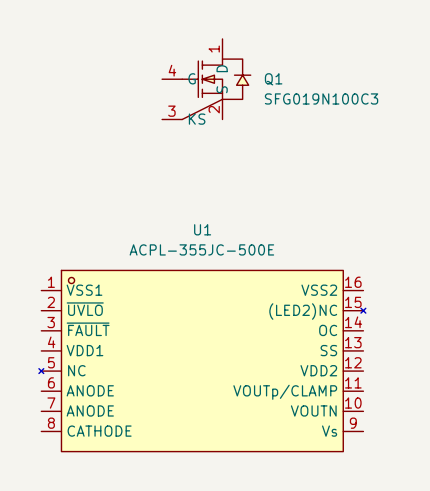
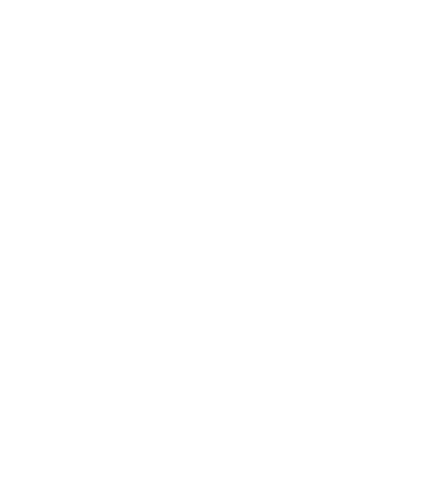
Q1: SFG019N100C3 (206, 79) -> none
U1: ACPL-355JC-500E (202, 361) -> none

